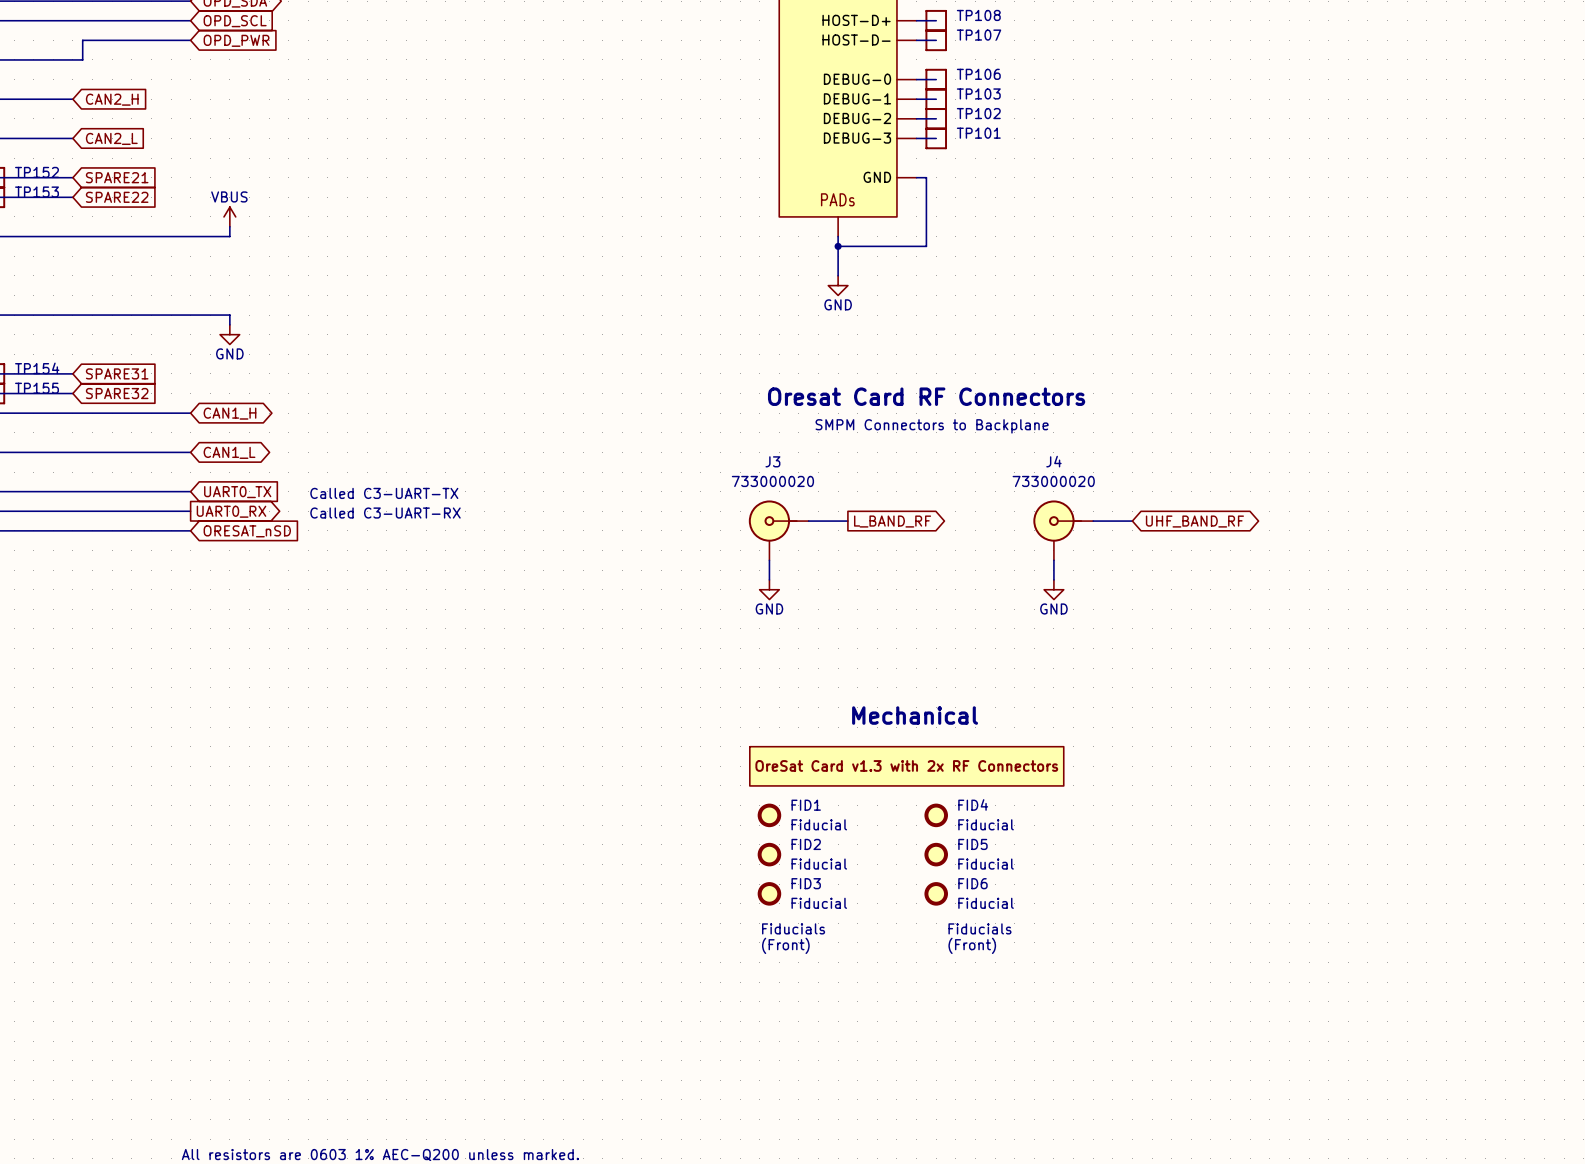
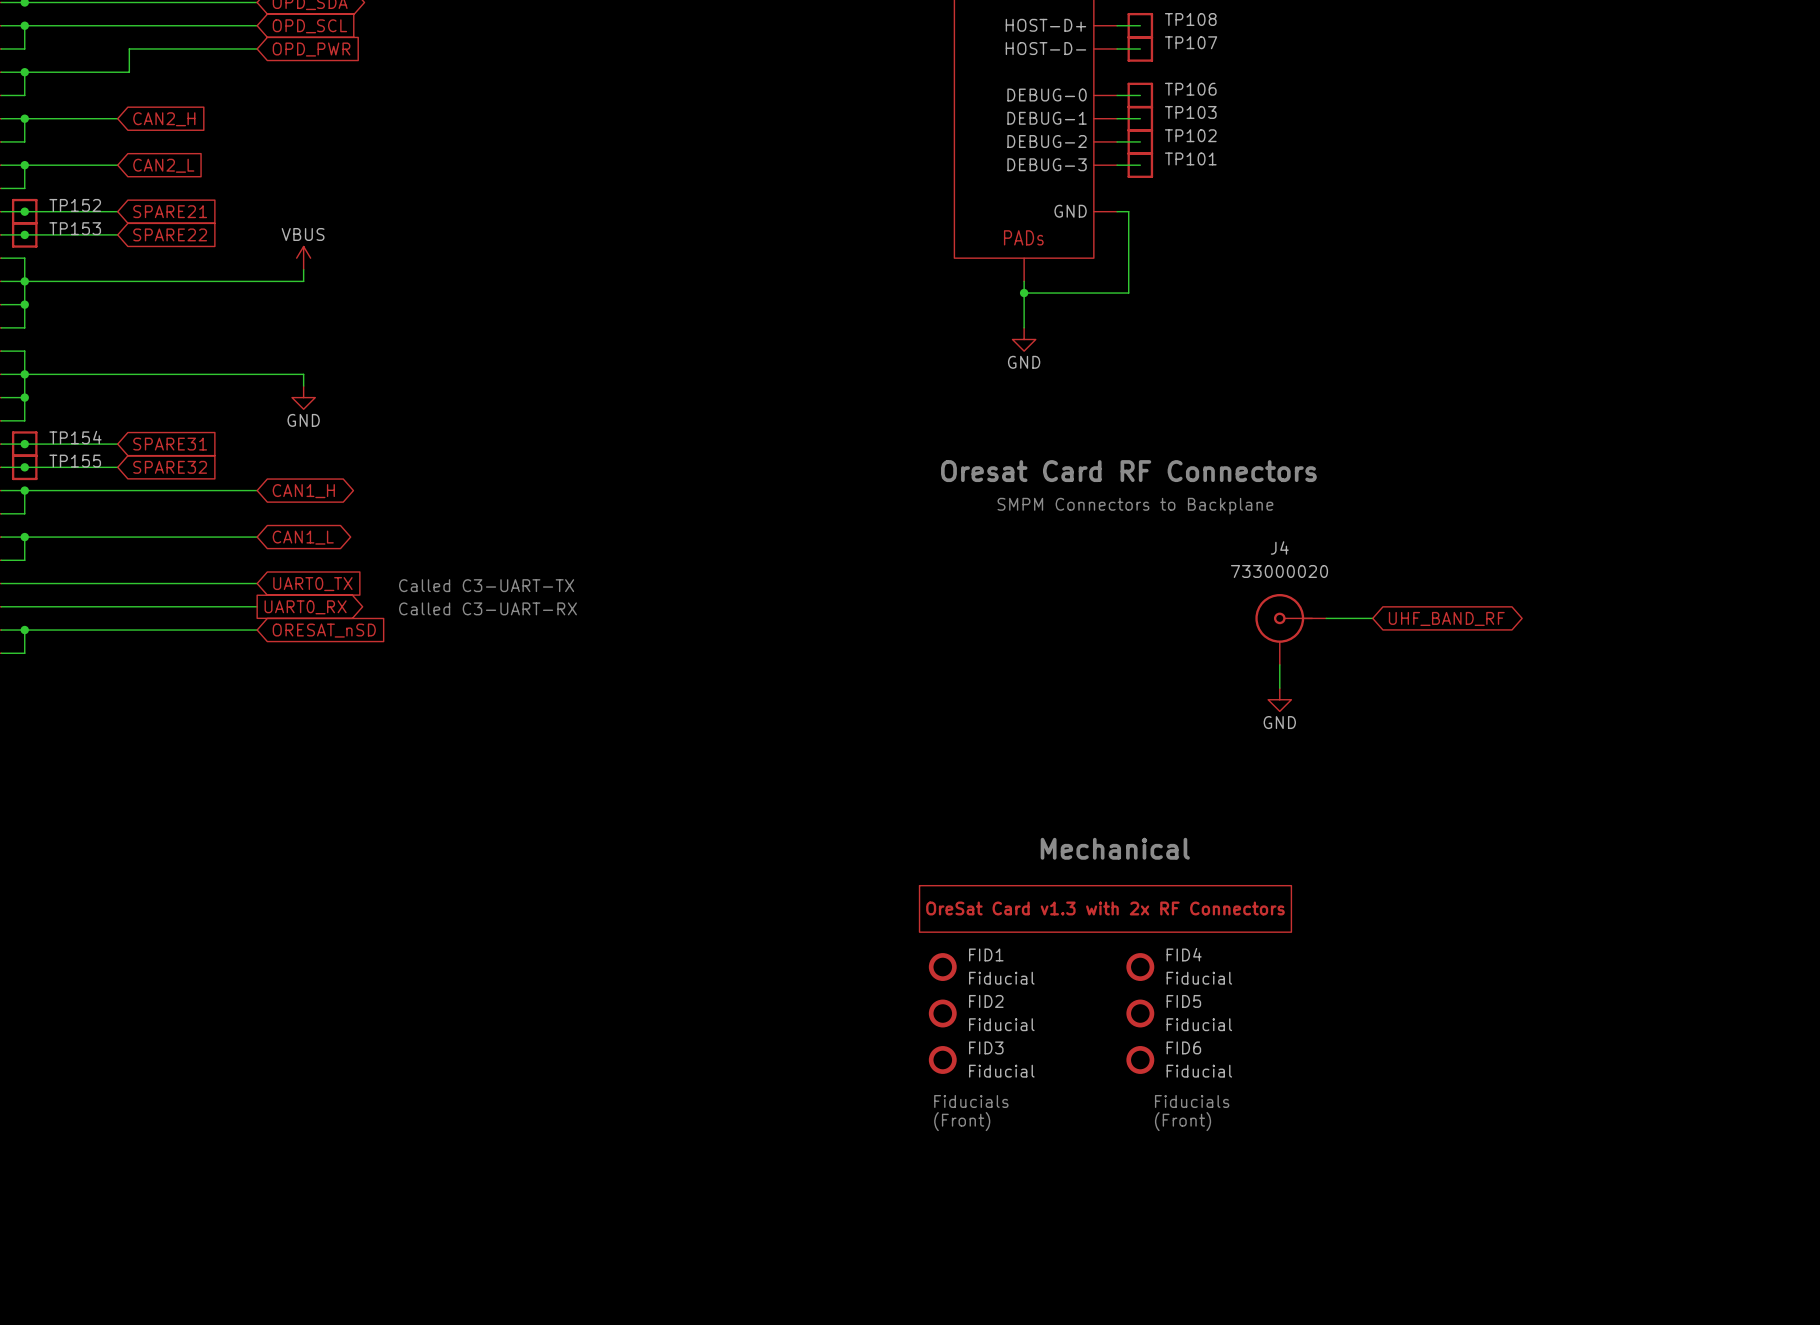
wire: (808, 521) (847, 521) -> none
global label: L_BAND_RF (892, 521) -> none
J3: 733000020 (778, 530) -> none
wire: (769, 560) (769, 579) -> none
power symbol: GND (769, 589) -> none

